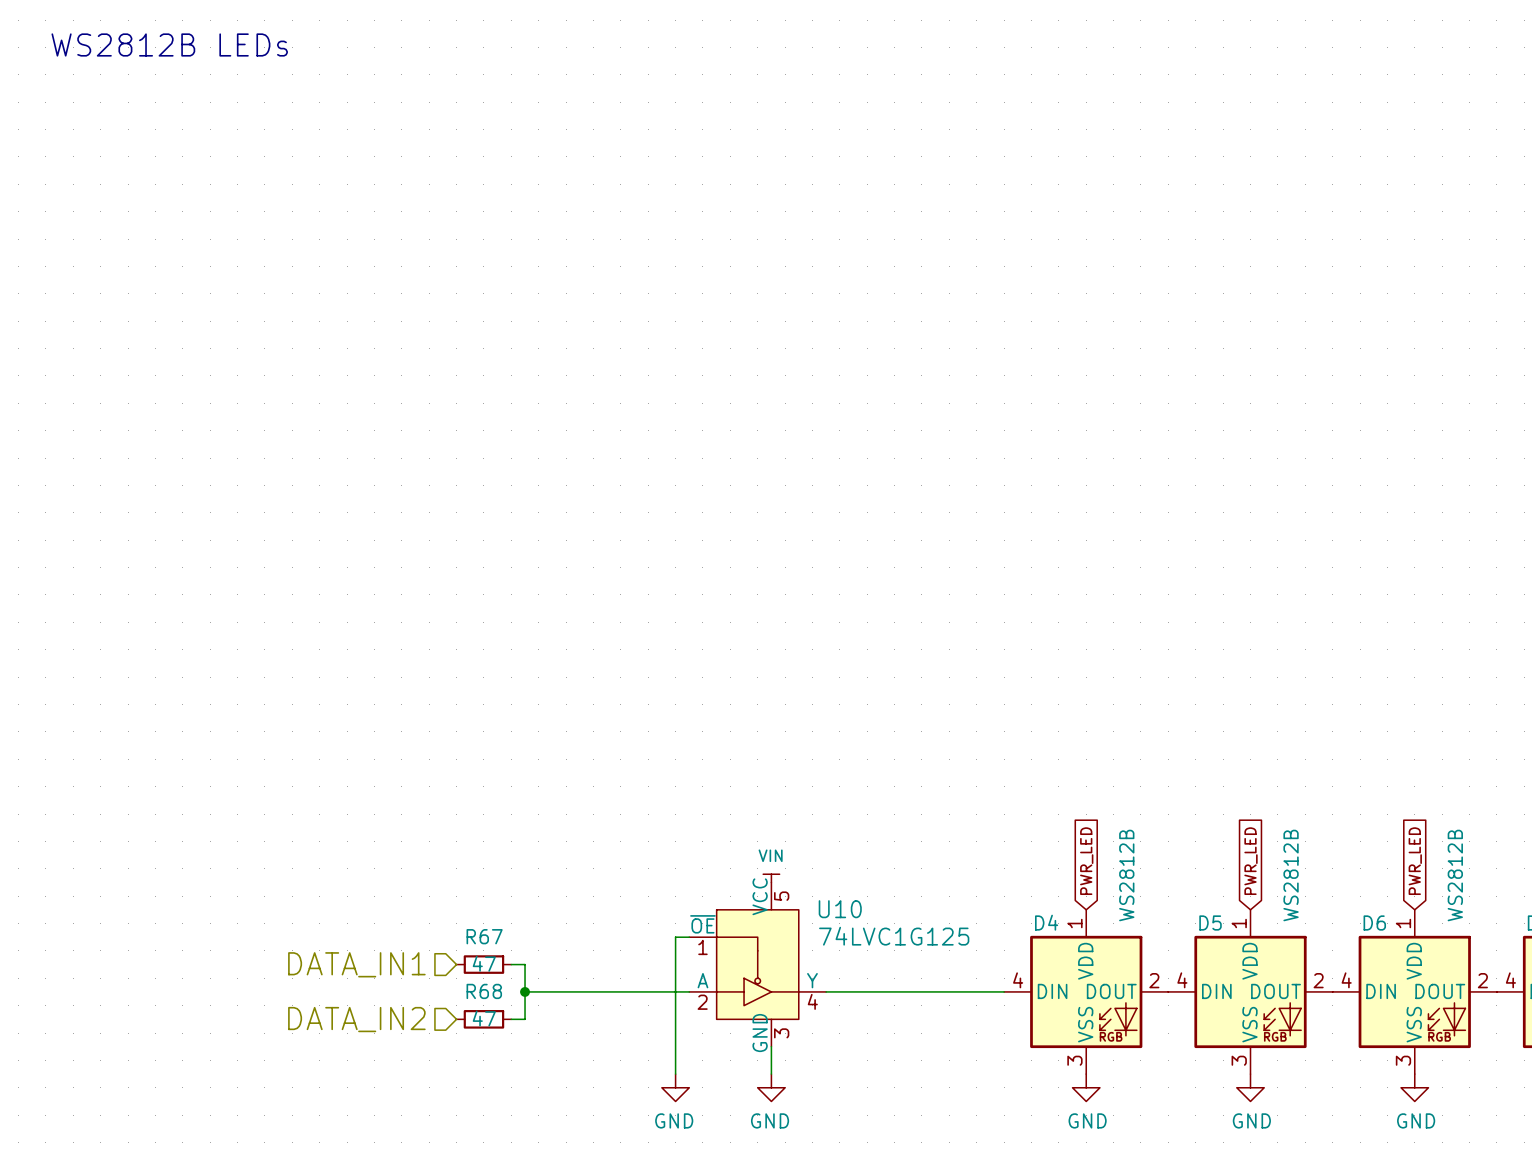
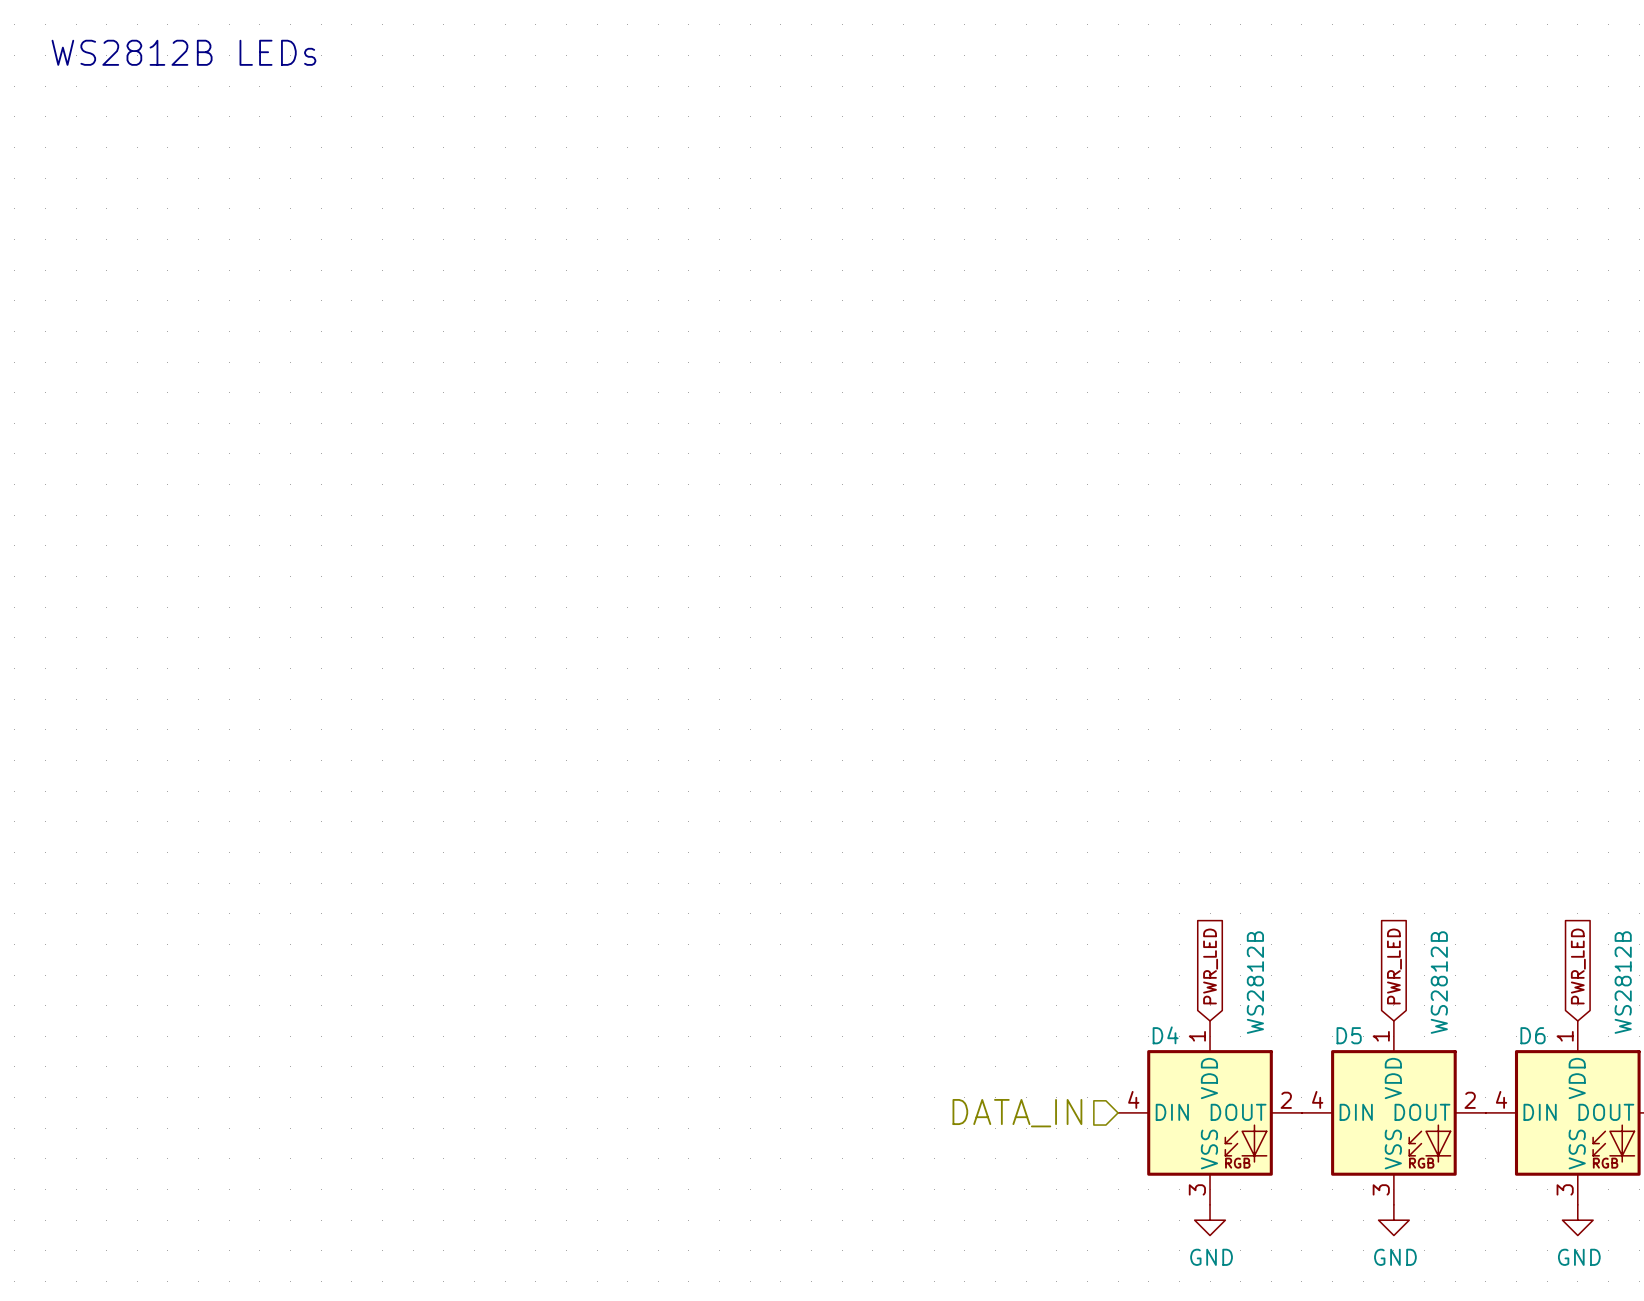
power symbol: VIN (771, 878) -> none
wire: (689, 937) (675, 937) (675, 1074) -> none
hierarchical label: DATA_IN1 (356, 964) -> none
R67: 47 (483, 964) -> none
wire: (511, 964) (525, 964) (525, 1019) (511, 1019) -> none
U10: 74LVC1G125 (757, 964) -> none
wire: (525, 991) (689, 991) -> none
junction: (525, 991) -> none
wire: (826, 991) (1004, 991) -> none
hierarchical label: none -> DATA_IN (1017, 1113)
hierarchical label: DATA_IN2 (356, 1019) -> none
R68: 47 (483, 1019) -> none
wire: (771, 1046) (771, 1074) -> none
power symbol: GND (675, 1087) -> none
power symbol: GND (771, 1087) -> none

